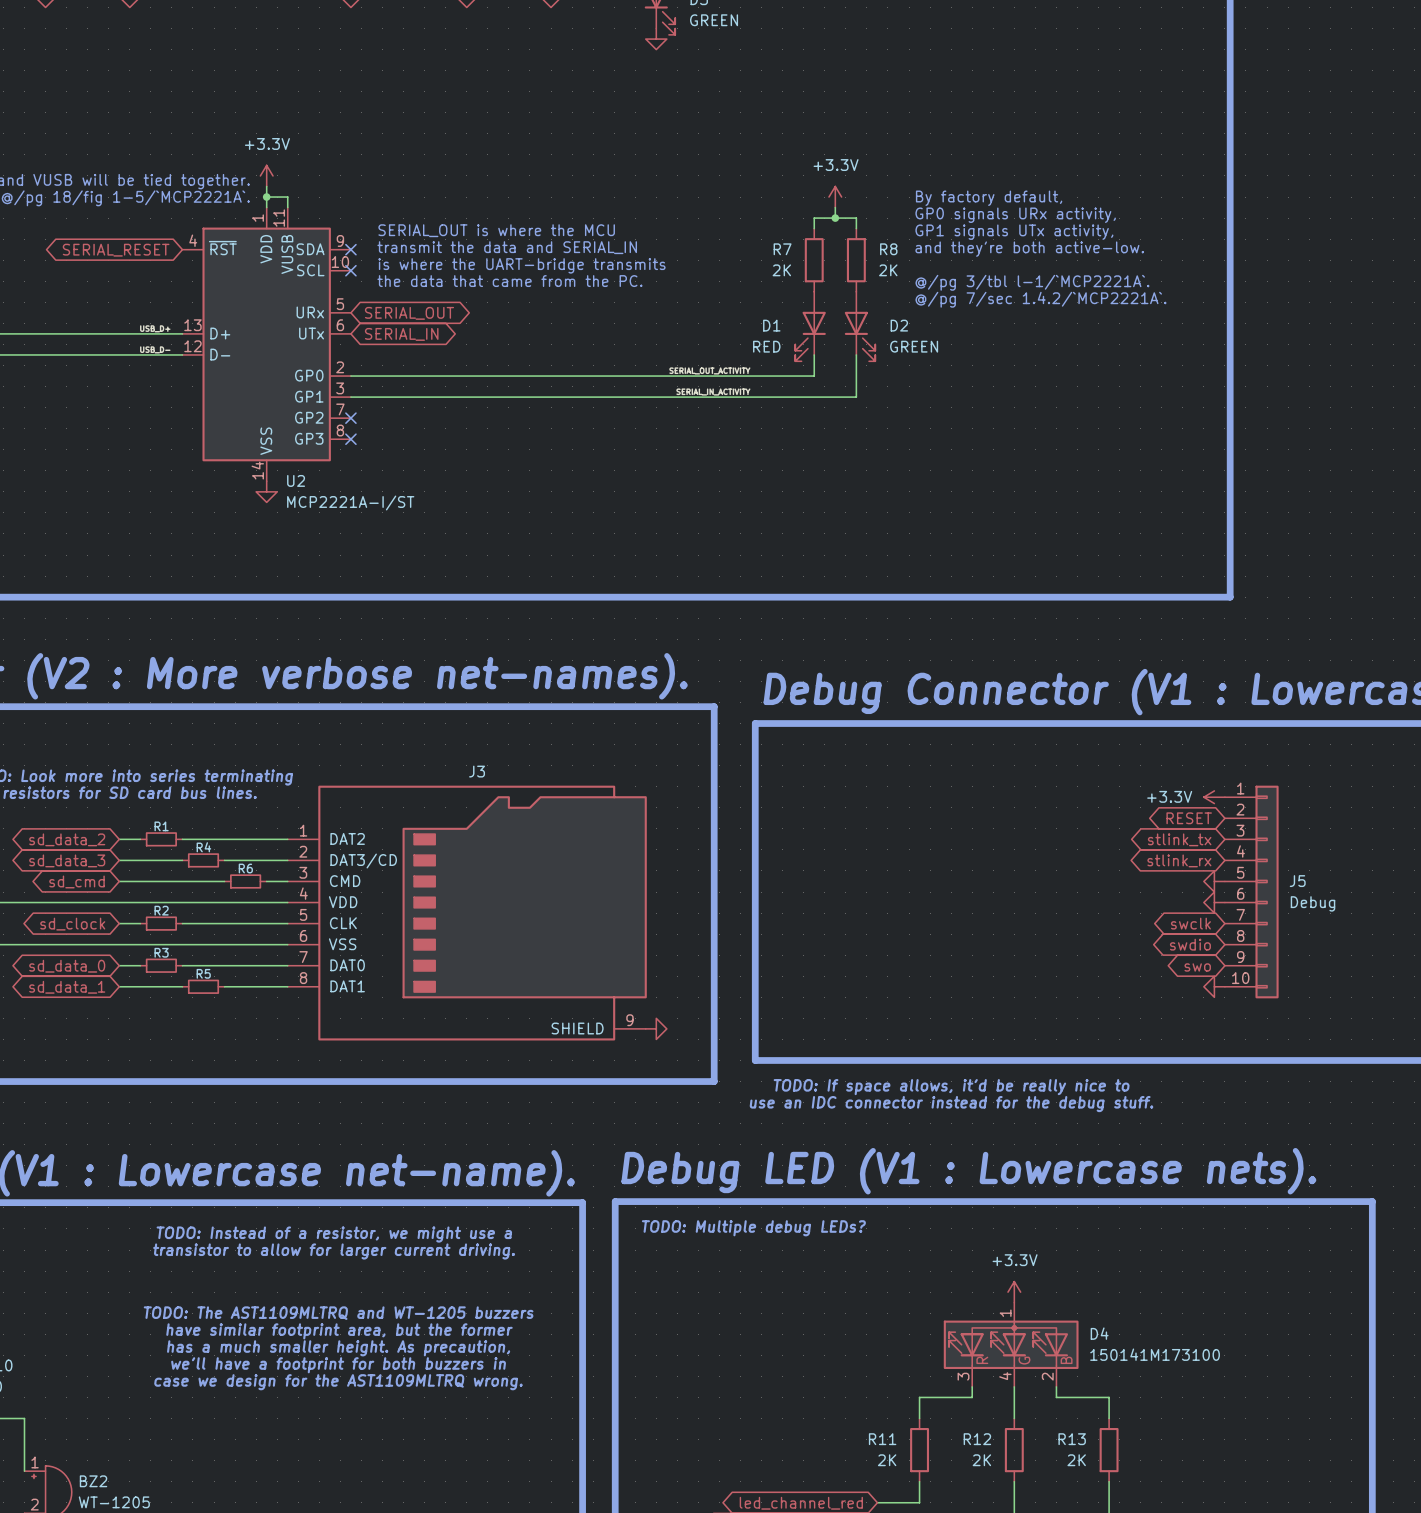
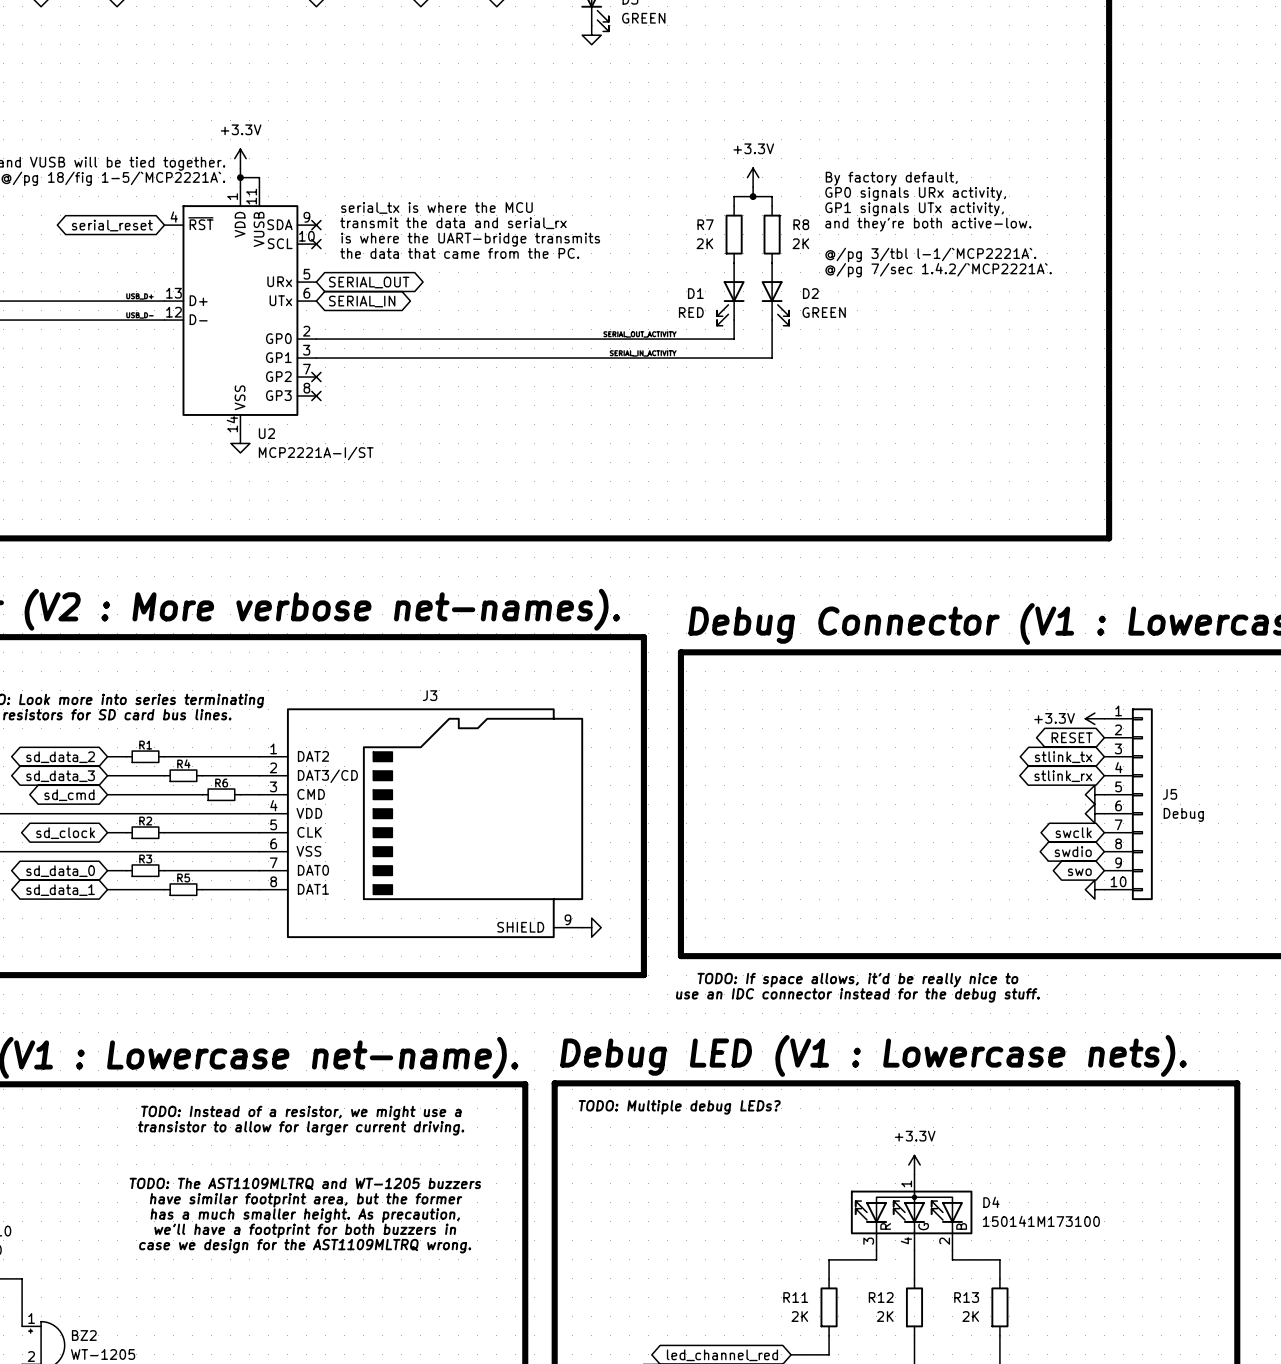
text: SERIAL_OUT is where the MCU (496, 230) -> serial_tx is where the MCU (436, 207)
text: transmit the data and SERIAL_IN (507, 247) -> transmit the data and serial_rx (453, 223)
global label: SERIAL_RESET (116, 250) -> serial_reset (112, 225)

